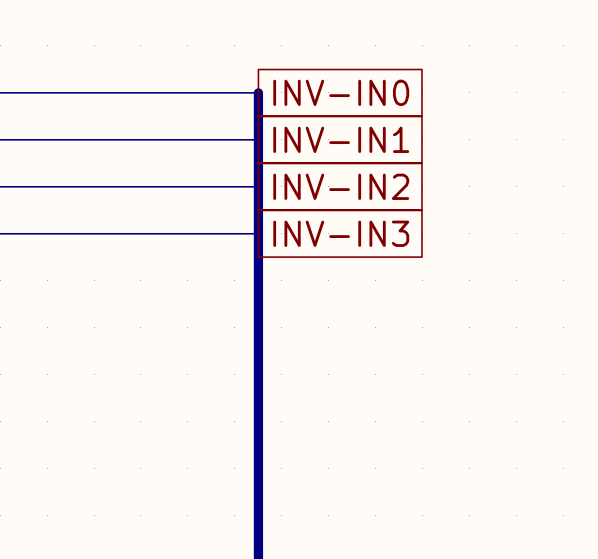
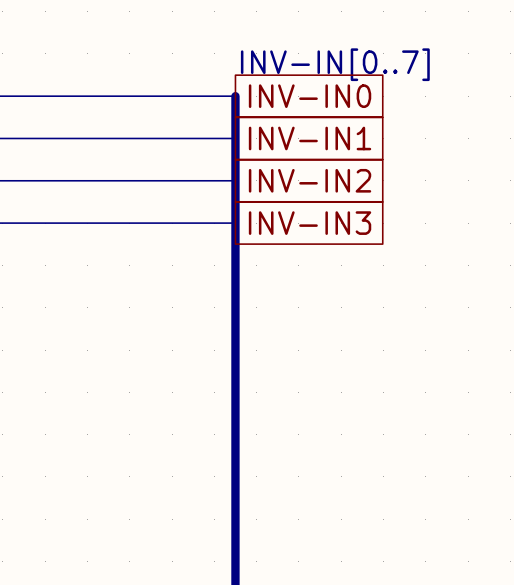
text: none -> INV-IN[0..7] (335, 64)

